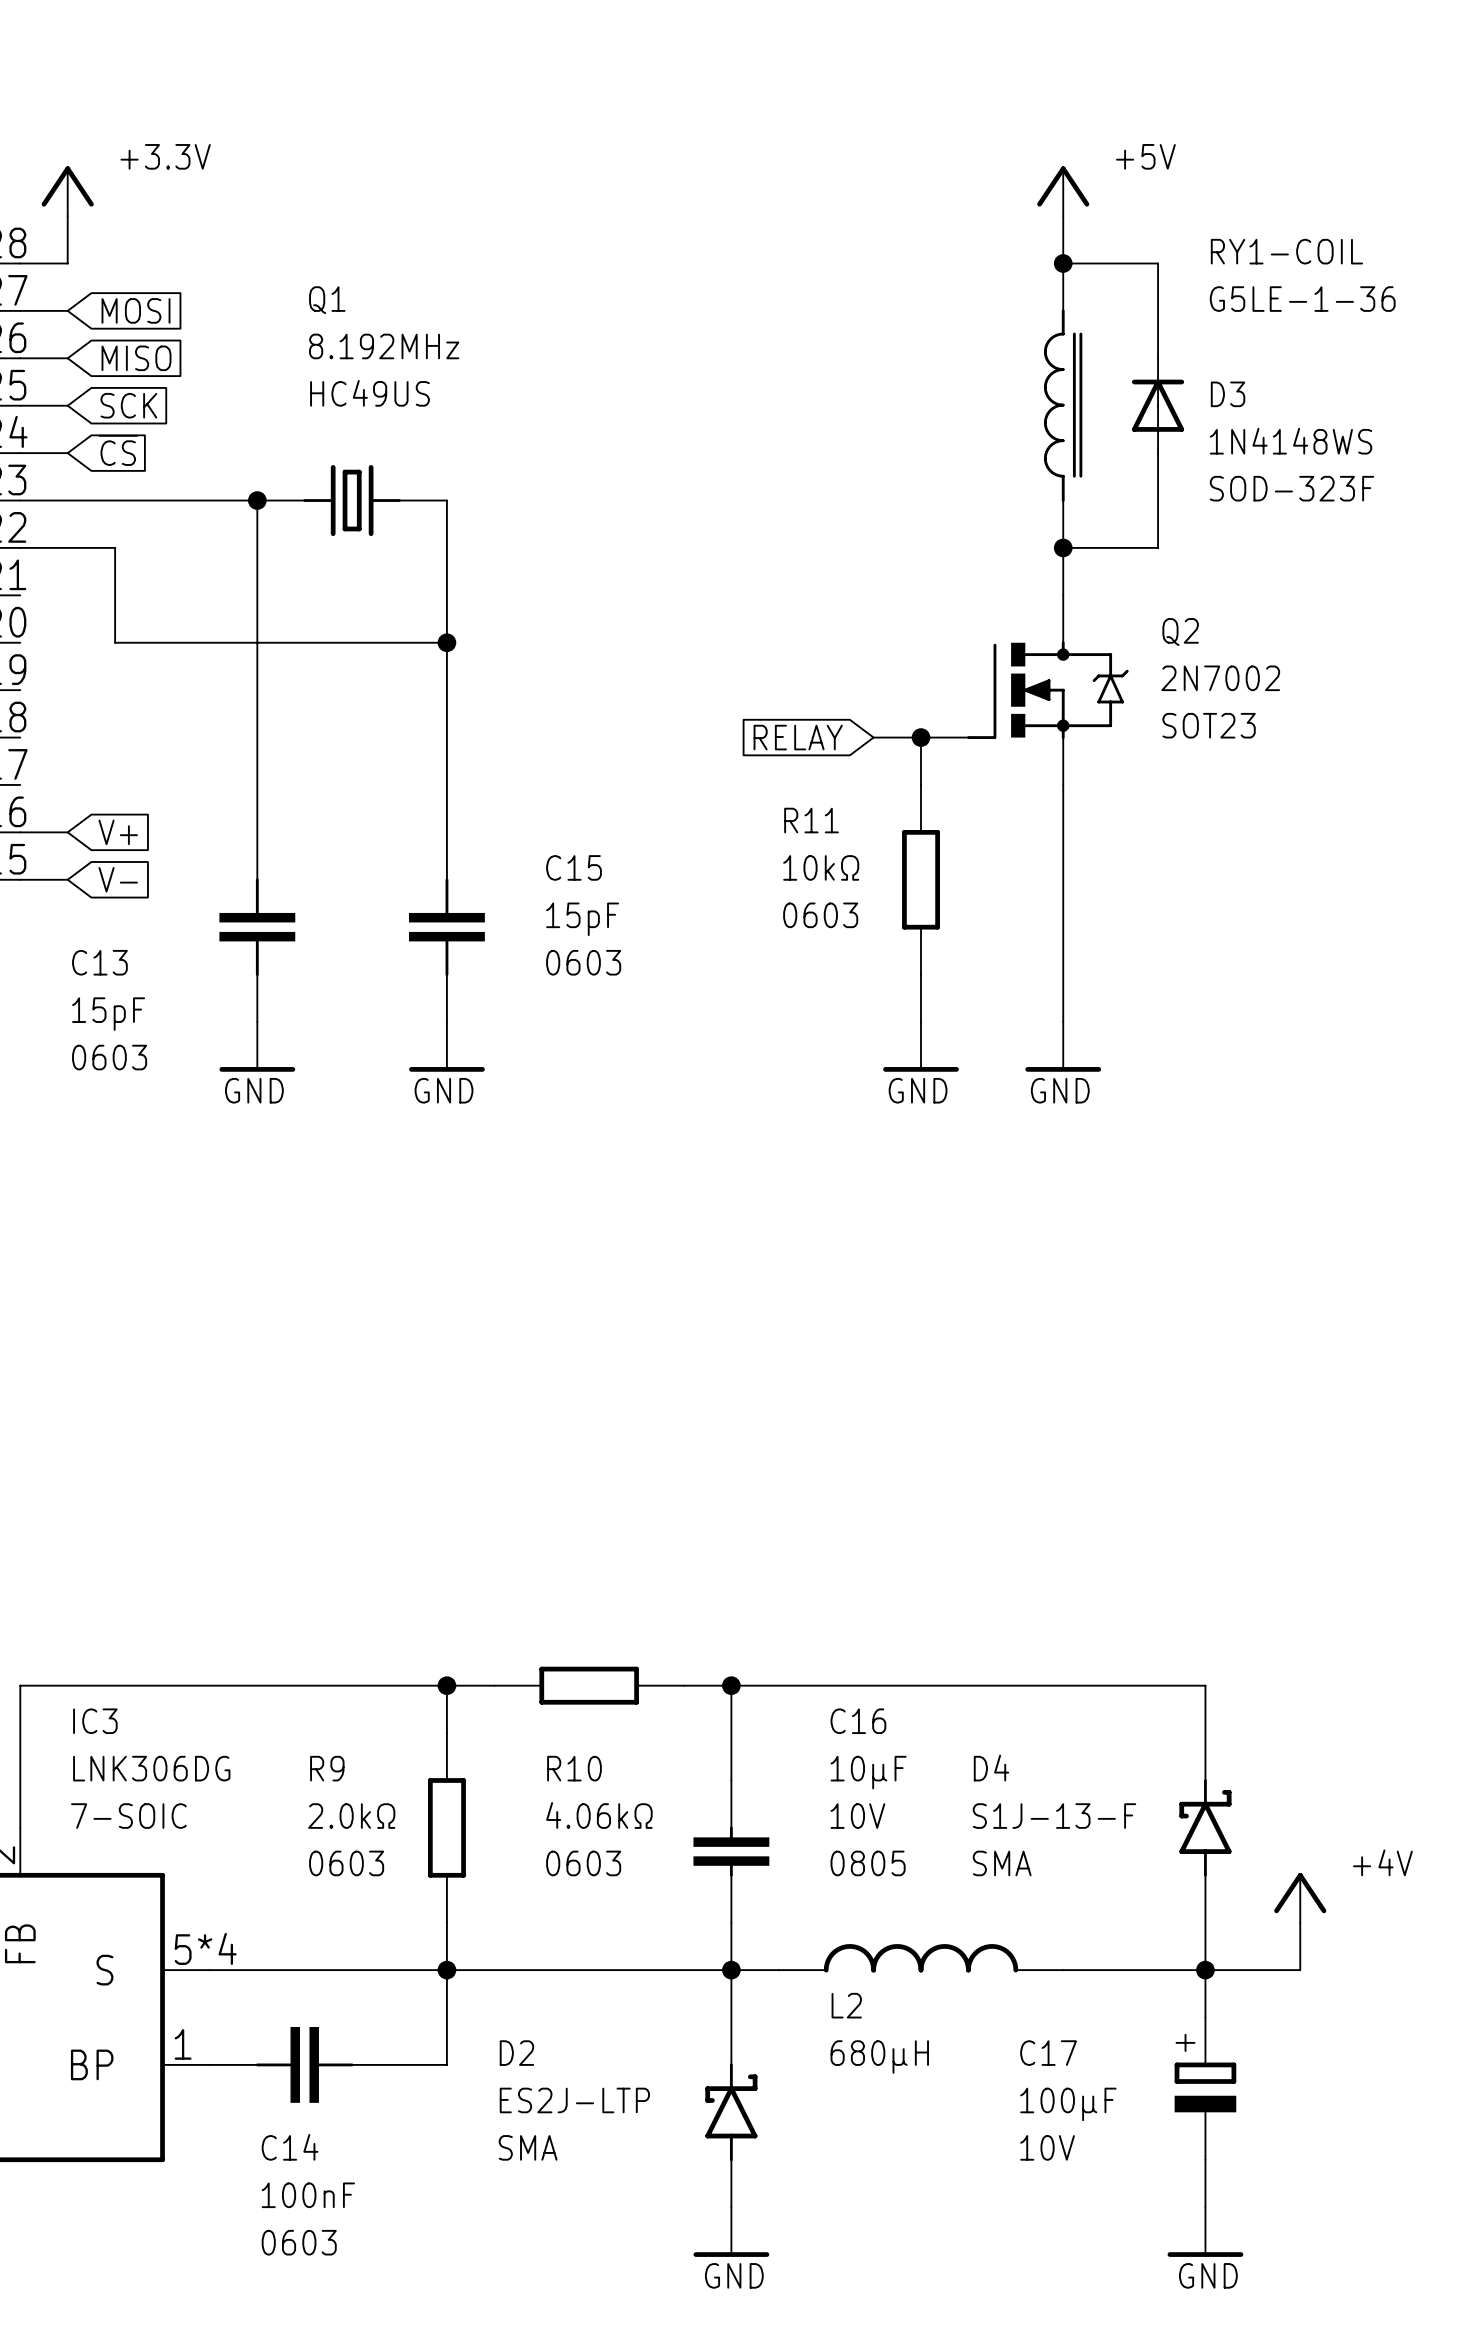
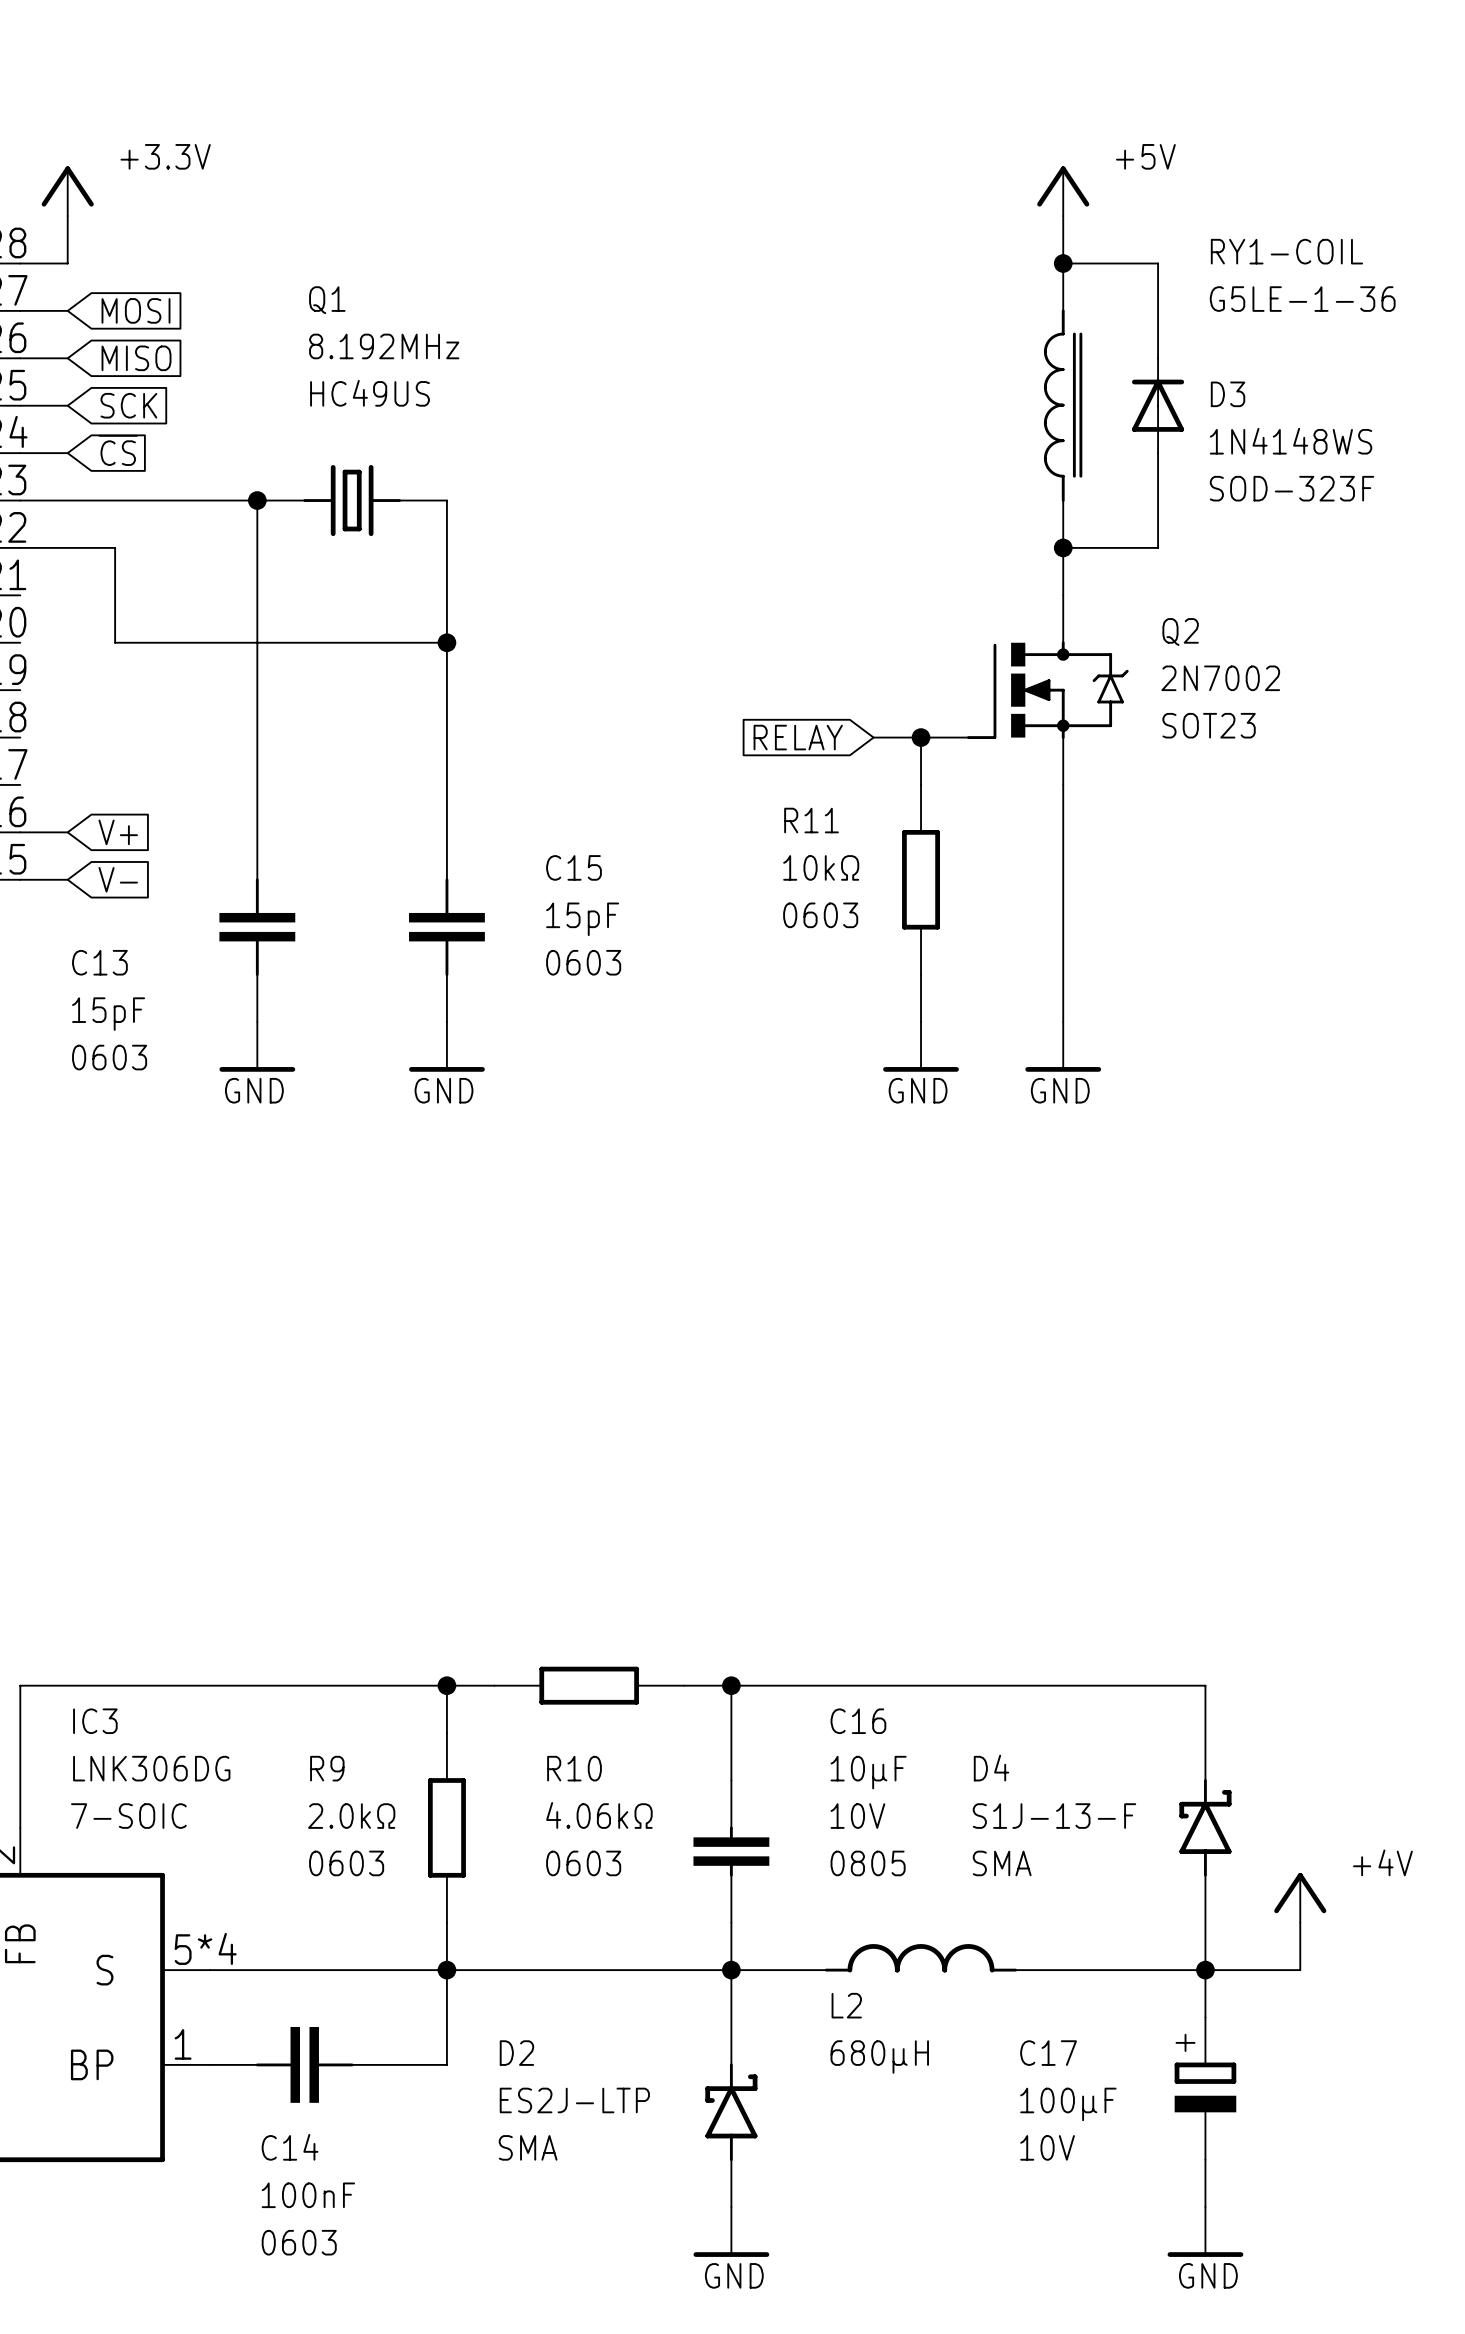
L2 symbol: [778, 1944, 1064, 1973] -> [824, 1944, 1018, 1973]

